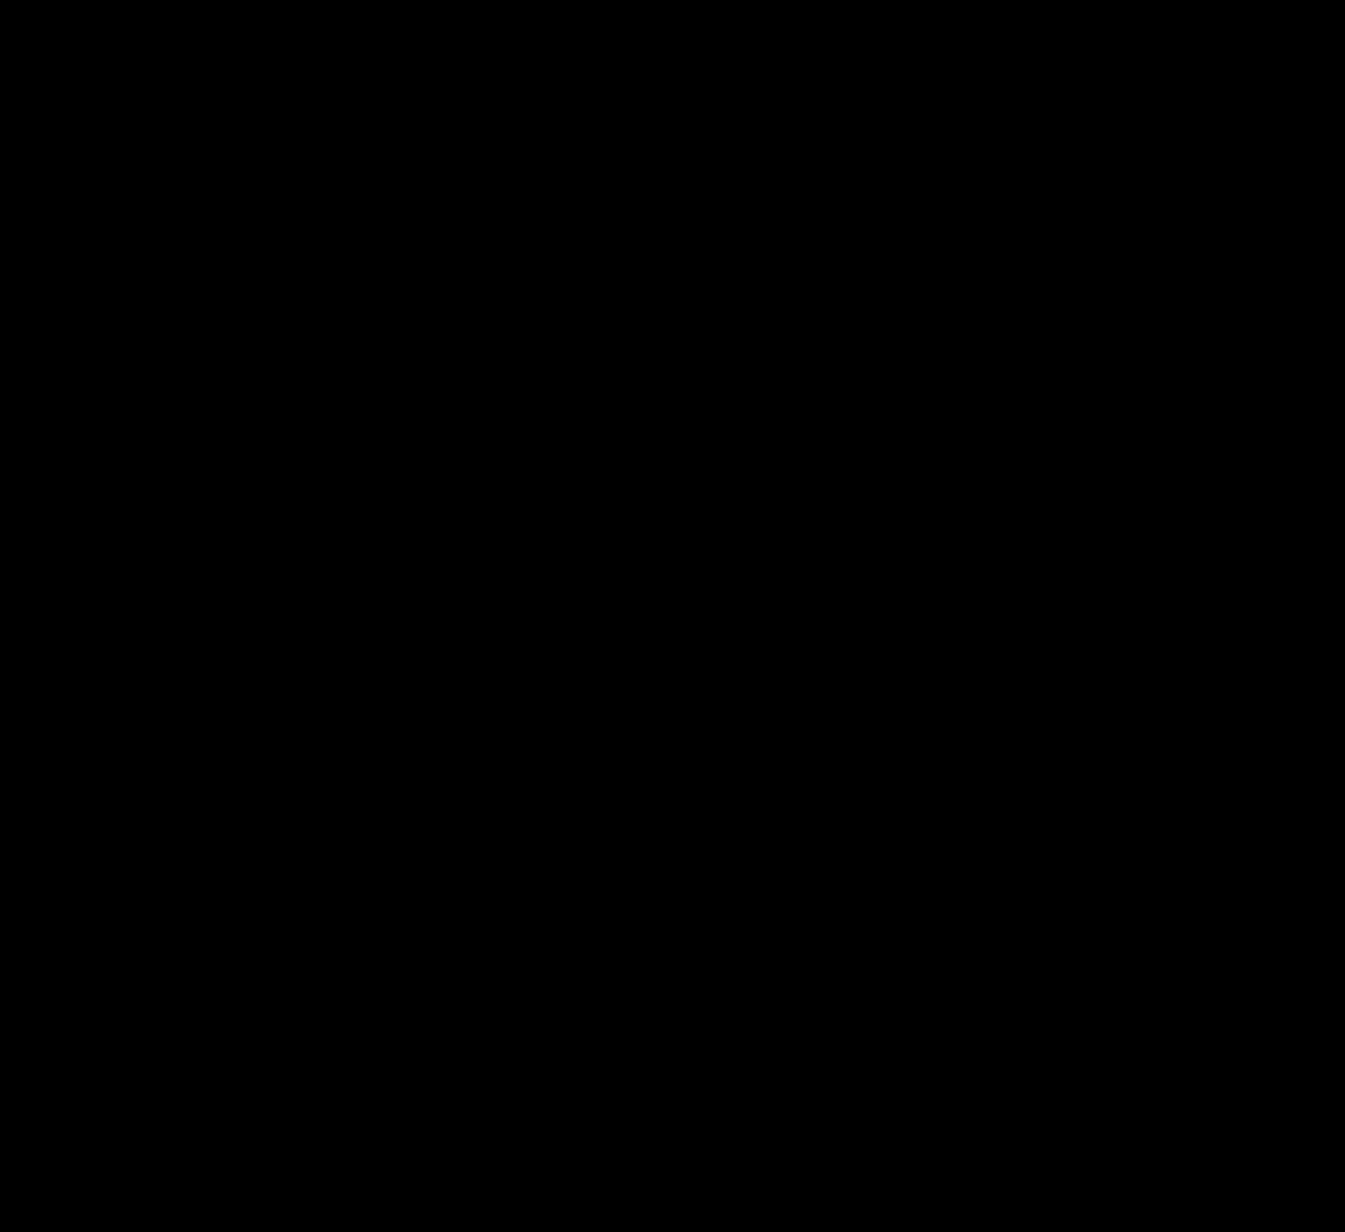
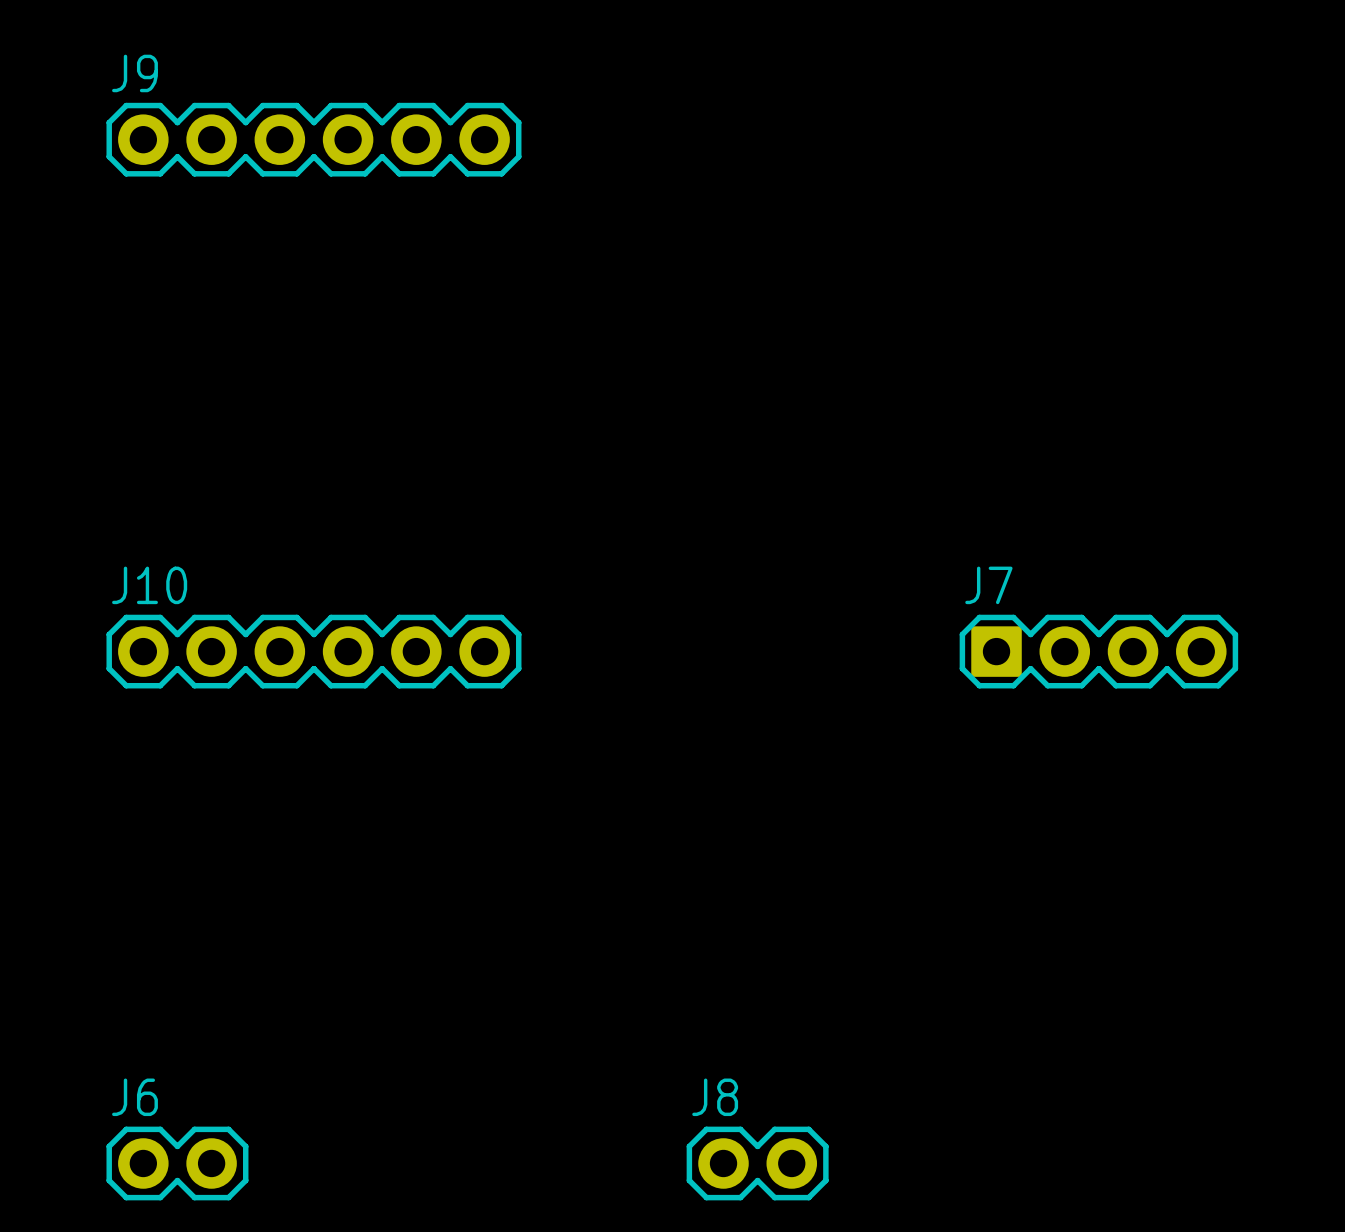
J9: none -> (313, 139)
J10: none -> (313, 651)
J7: none -> (1098, 651)
J6: none -> (177, 1163)
J8: none -> (757, 1163)

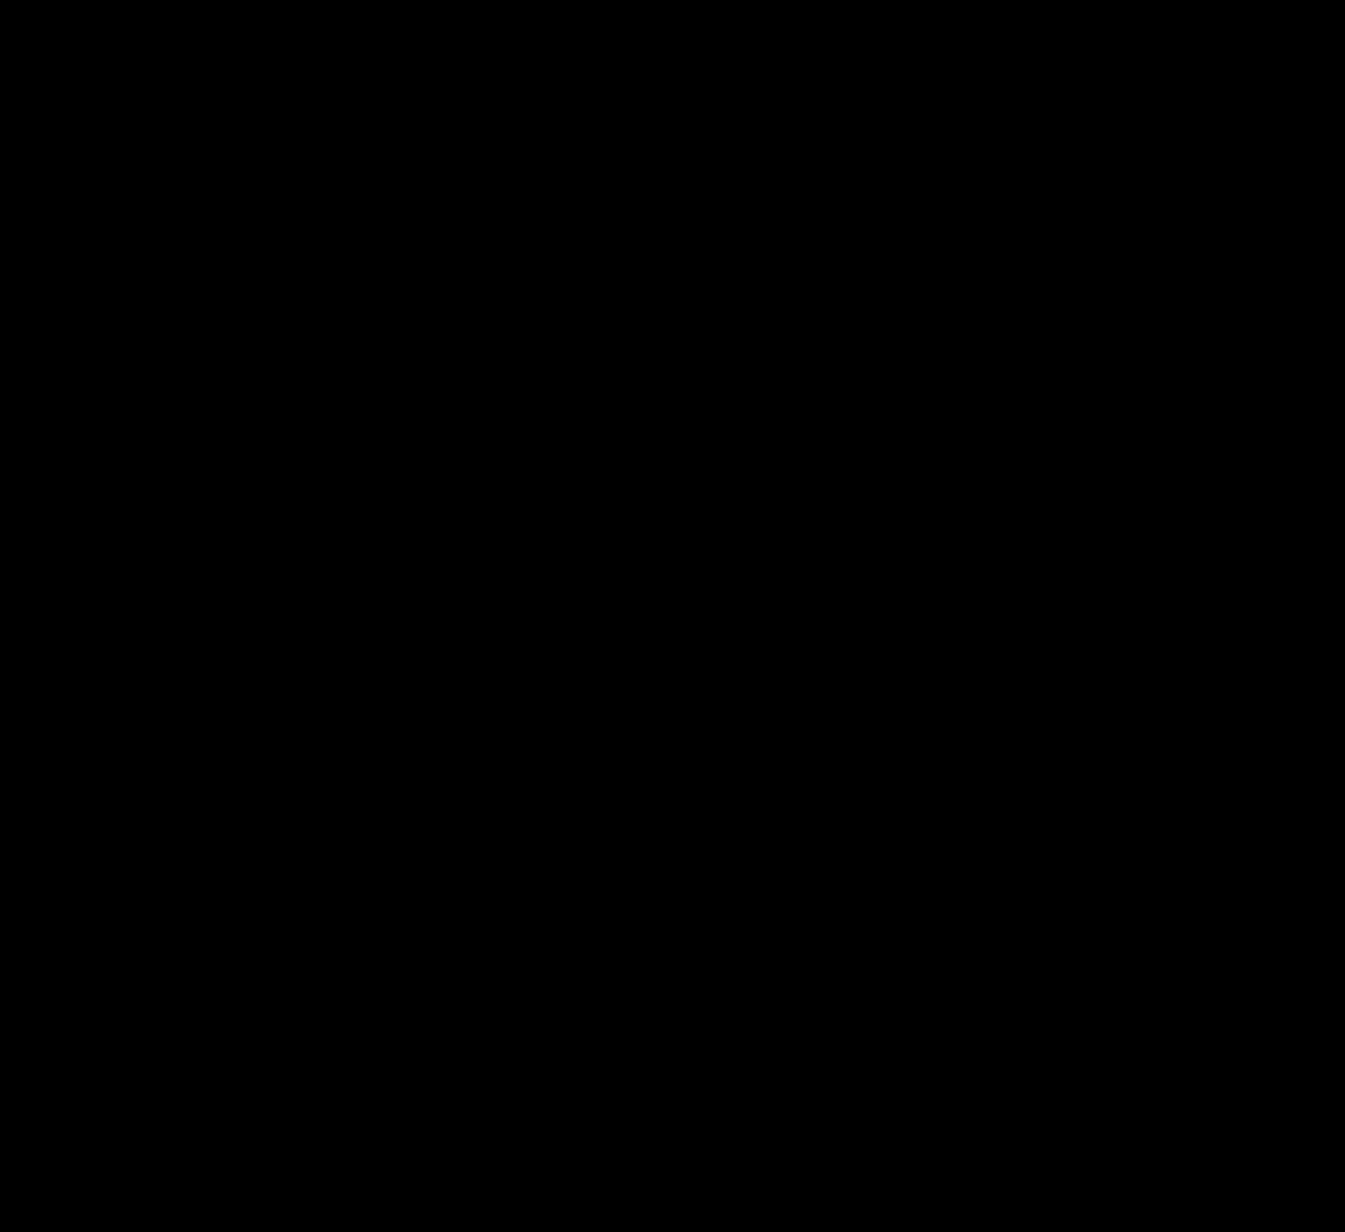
J9: (313, 139) -> none
J10: (313, 651) -> none
J7: (1098, 651) -> none
J6: (177, 1163) -> none
J8: (757, 1163) -> none

